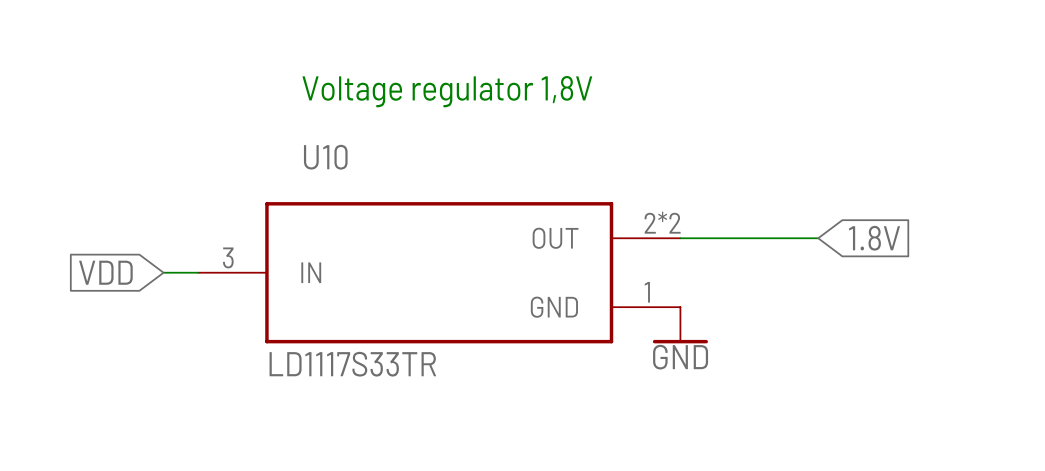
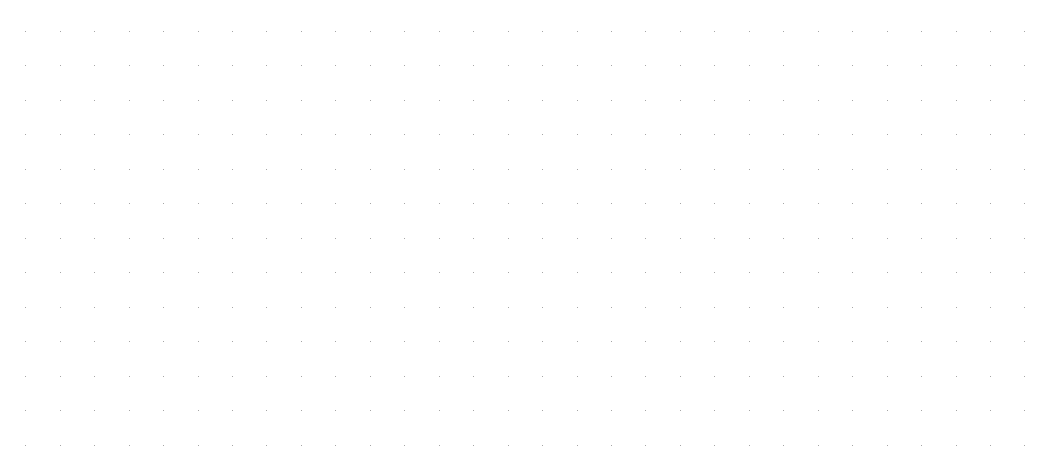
text: Voltage regulator 1,8V (447, 91) -> none
wire: (680, 238) (818, 238) -> none
global label: 1.8V (874, 238) -> none
global label: VDD (105, 272) -> none
wire: (163, 272) (198, 272) -> none
U10: LD1117S33TR (439, 272) -> none
power symbol: GND (680, 325) -> none

